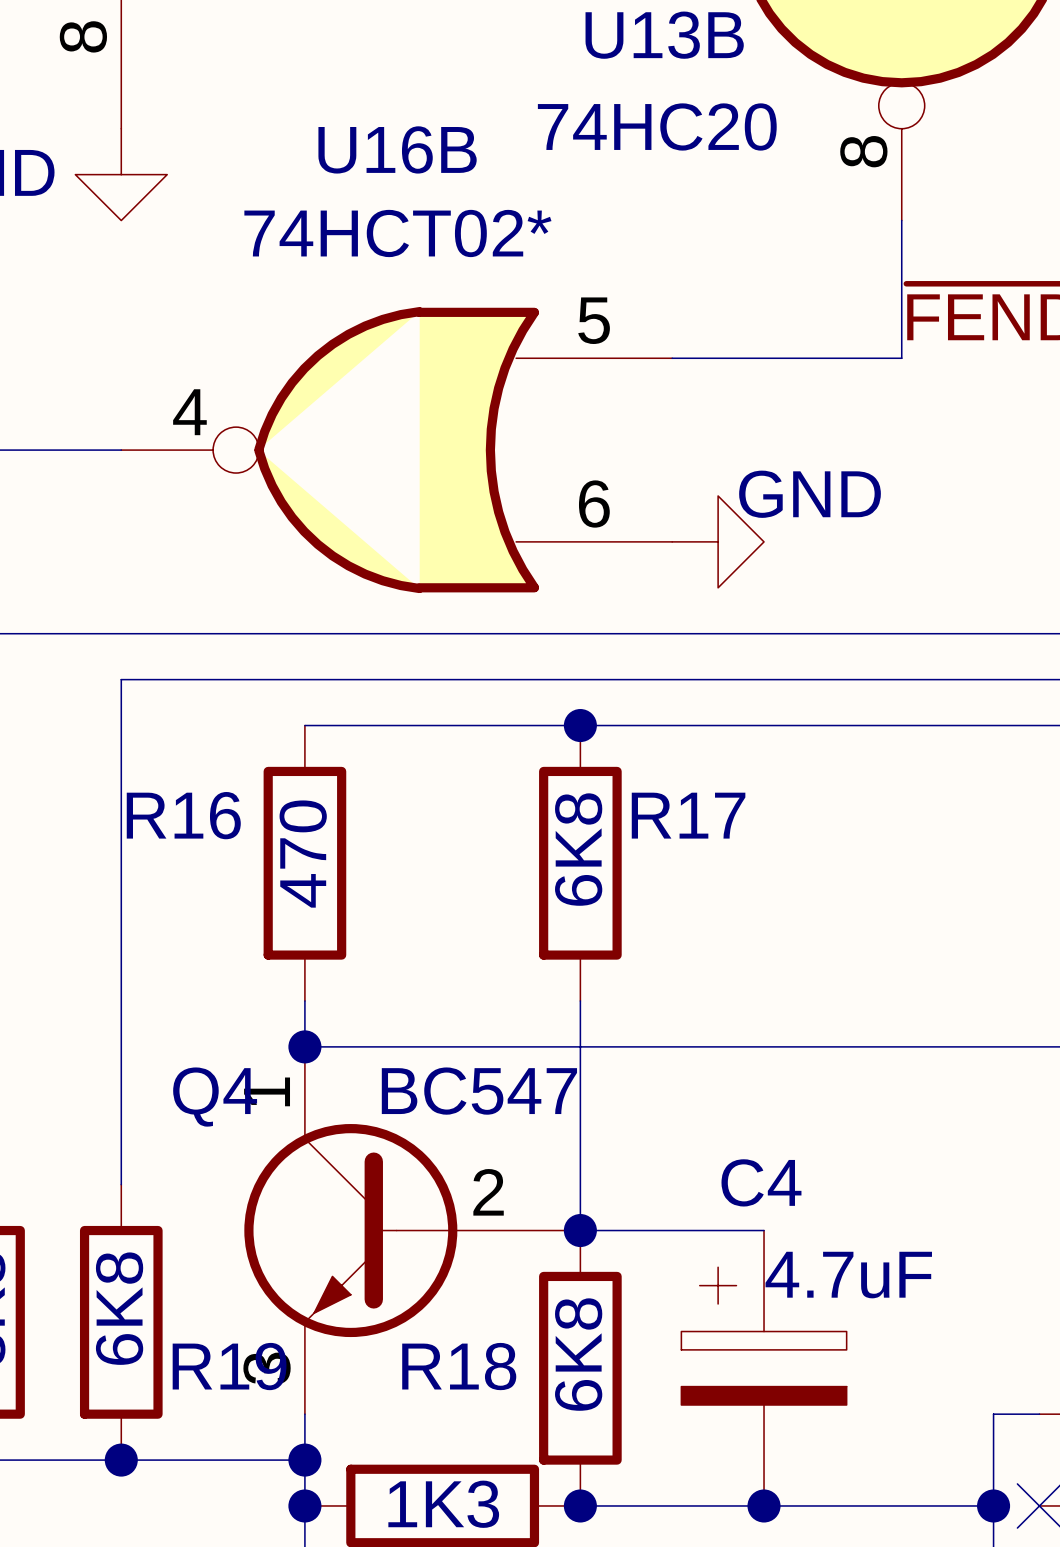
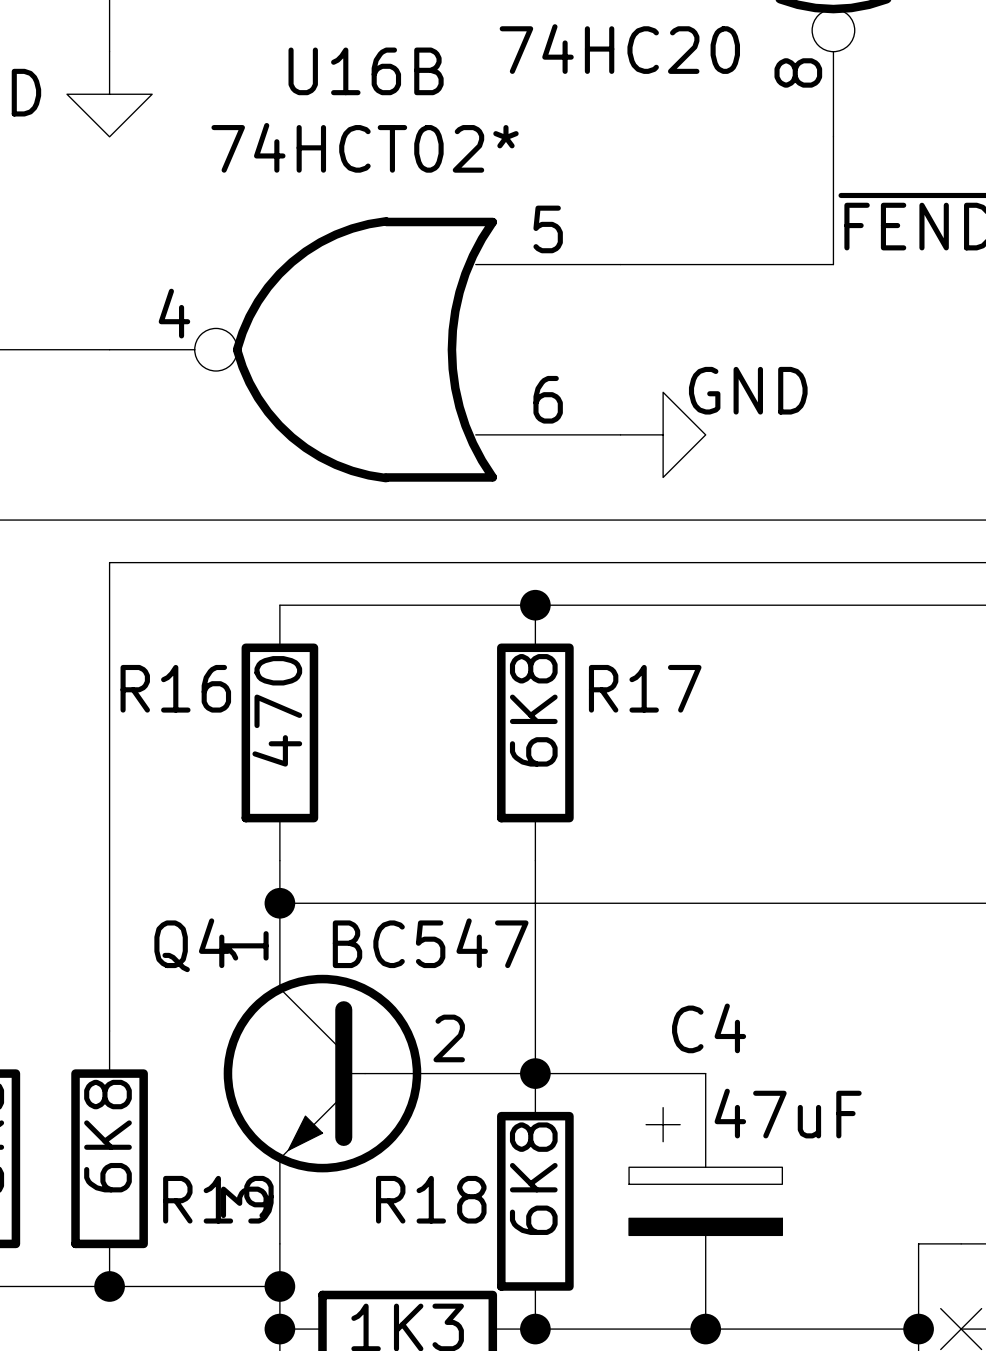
C4 value: 4.7uF (848, 1275) -> 47uF (788, 1113)

